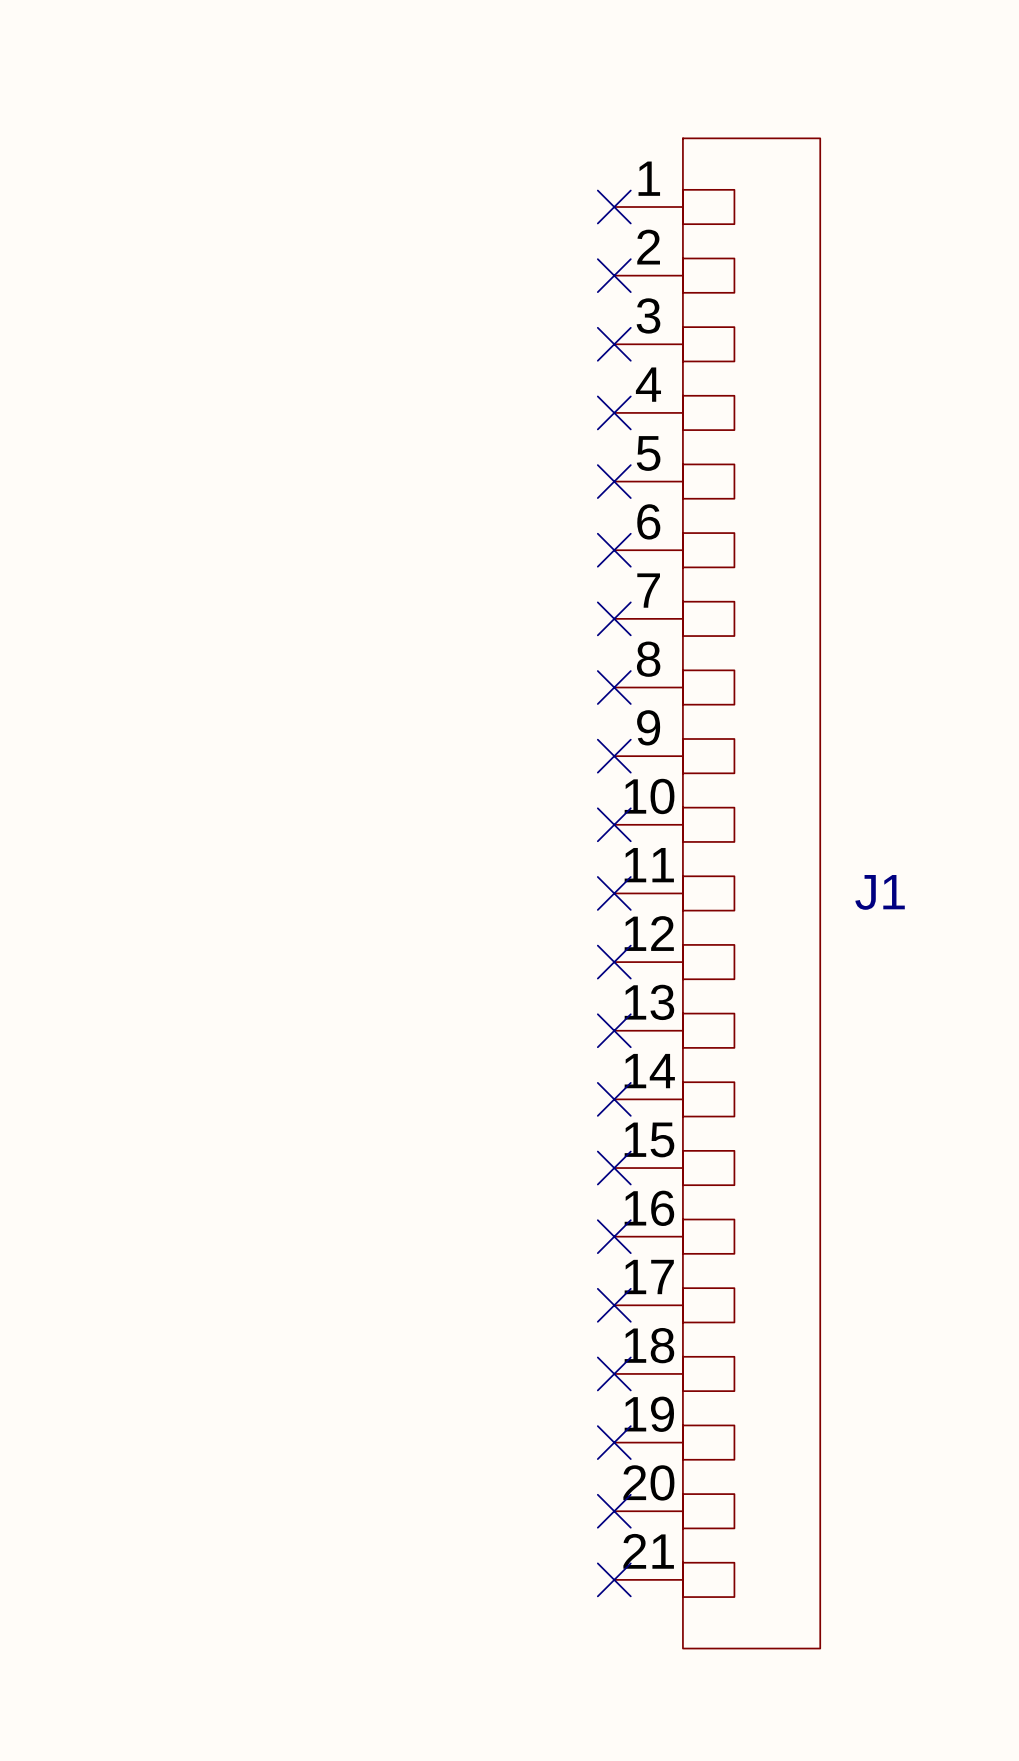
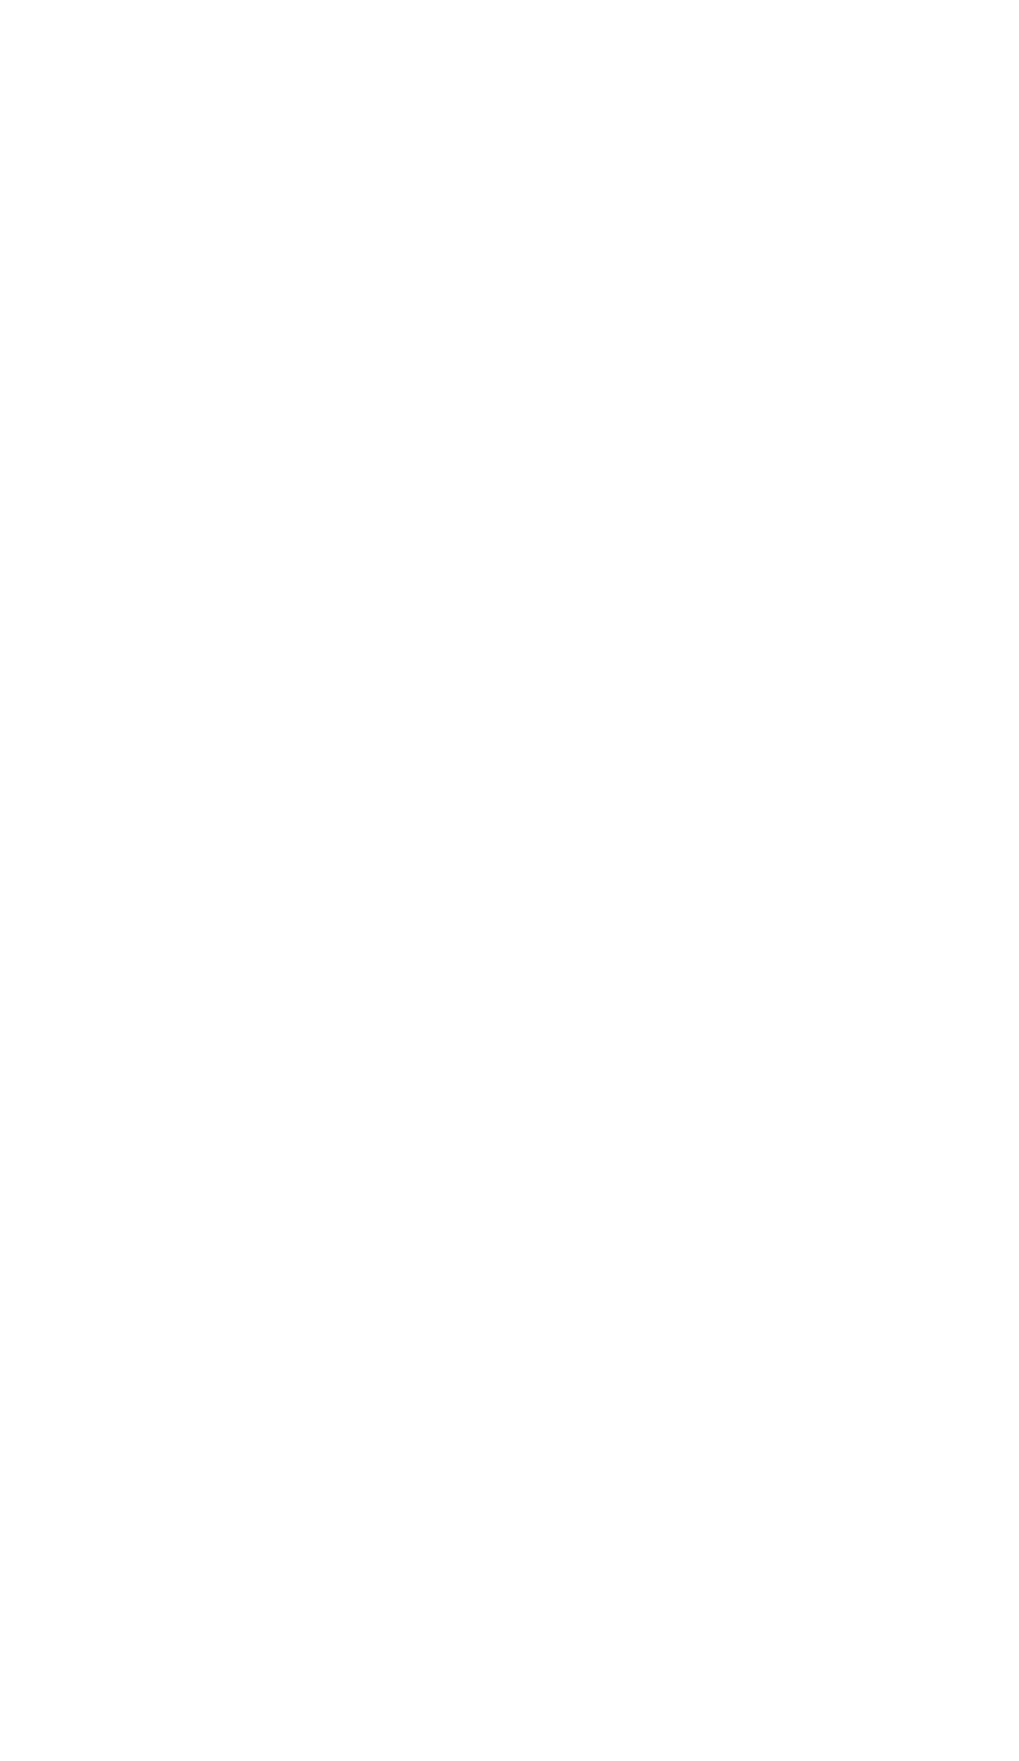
no-connect mark: (614, 207) -> none
no-connect mark: (614, 275) -> none
no-connect mark: (614, 344) -> none
no-connect mark: (614, 412) -> none
no-connect mark: (614, 481) -> none
no-connect mark: (614, 550) -> none
no-connect mark: (614, 618) -> none
no-connect mark: (614, 687) -> none
no-connect mark: (614, 756) -> none
no-connect mark: (614, 824) -> none
no-connect mark: (614, 893) -> none
J1: (717, 893) -> none
no-connect mark: (614, 962) -> none
no-connect mark: (614, 1030) -> none
no-connect mark: (614, 1099) -> none
no-connect mark: (614, 1168) -> none
no-connect mark: (614, 1236) -> none
no-connect mark: (614, 1305) -> none
no-connect mark: (614, 1373) -> none
no-connect mark: (614, 1442) -> none
no-connect mark: (614, 1511) -> none
no-connect mark: (614, 1579) -> none

